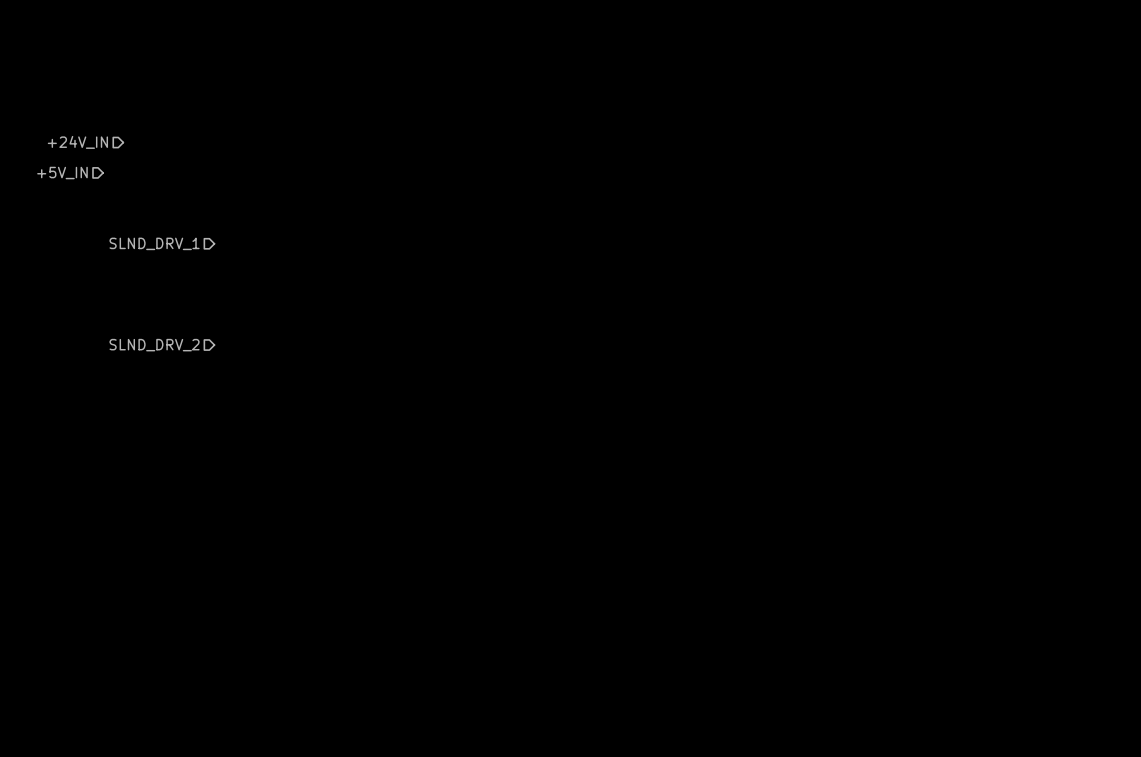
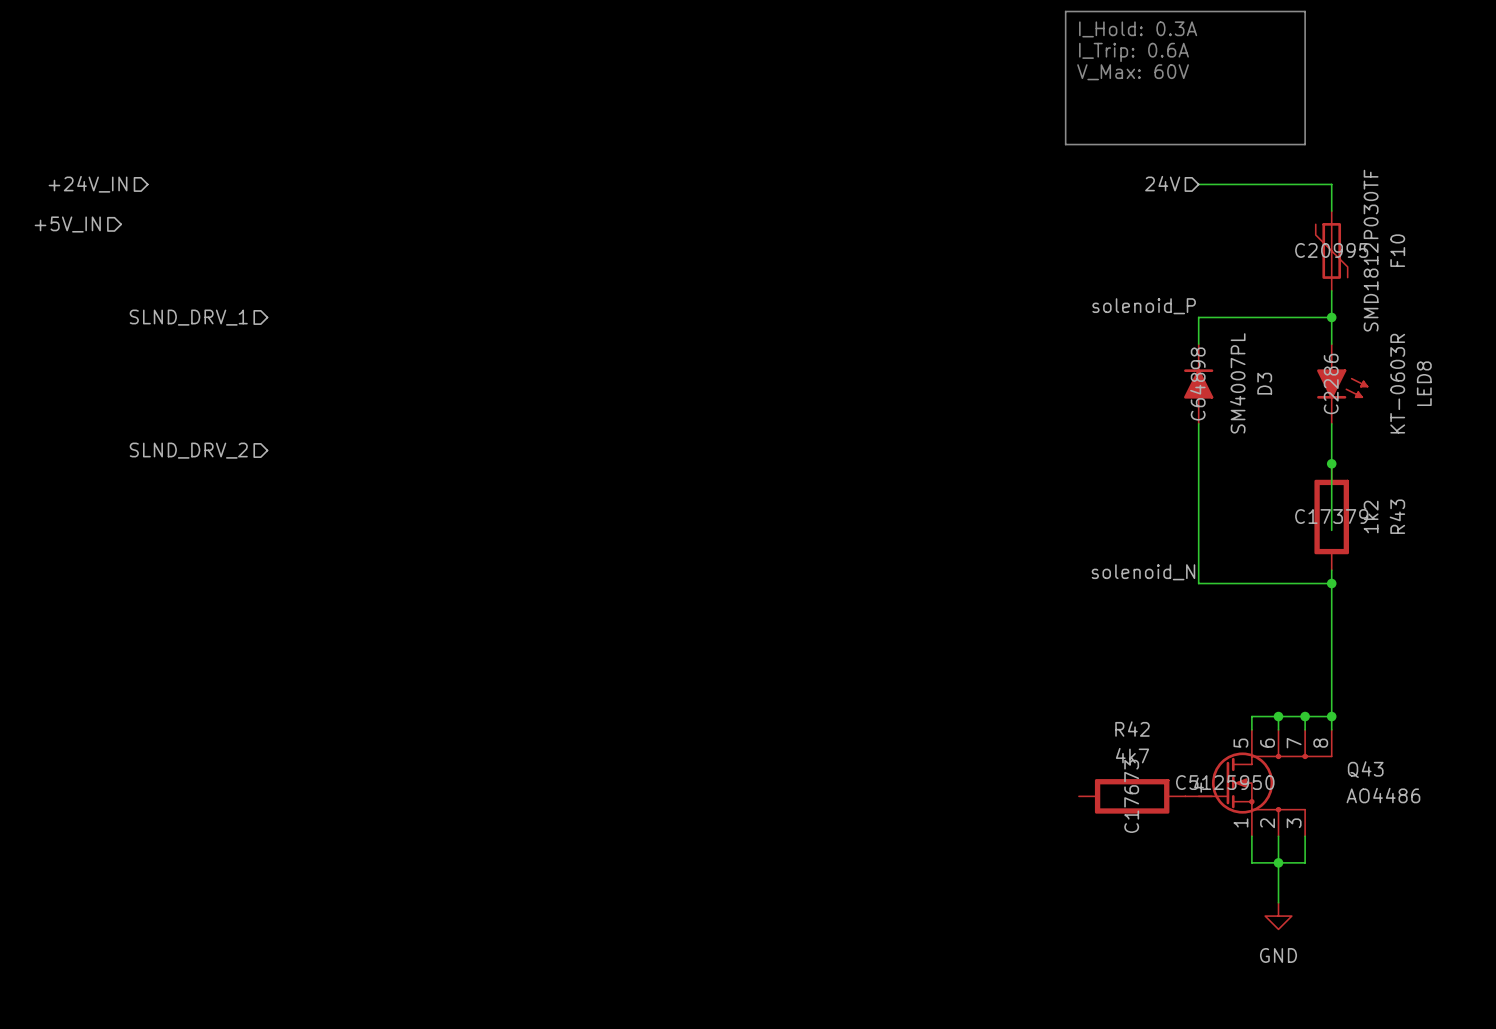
line: none -> (1065, 11) (1305, 11) (1305, 144) (1065, 144) (1065, 11)
text: none -> I_Hold: 0.3A (1138, 29)
text: none -> I_Trip: 0.6A (1134, 52)
text: none -> V_Max: 60V (1133, 72)
hierarchical label: none -> 24V (1162, 183)
wire: none -> (1198, 184) (1331, 184) (1331, 211)
F10: none -> SMD1812P030TF (1331, 250)
wire: none -> (1331, 290) (1331, 344)
label: none -> solenoid_P (1144, 306)
wire: none -> (1331, 317) (1198, 317) (1198, 344)
junction: none -> (1331, 317)
D3: none -> SM4007PL (1198, 383)
LED8: none -> KT-0603R (1342, 383)
wire: none -> (1198, 423) (1198, 583) (1331, 583)
wire: none -> (1331, 423) (1331, 530)
junction: none -> (1331, 463)
R43: none -> 1k2 (1331, 517)
wire: none -> (1331, 570) (1331, 729)
label: none -> solenoid_N (1143, 572)
junction: none -> (1331, 583)
wire: none -> (1278, 716) (1278, 729)
junction: none -> (1278, 716)
wire: none -> (1305, 716) (1305, 729)
junction: none -> (1305, 716)
wire: none -> (1331, 716) (1251, 716) (1251, 729)
junction: none -> (1331, 716)
Q43: none -> AO4486 (1258, 783)
R42: none -> 4k7 (1132, 796)
wire: none -> (1251, 836) (1251, 862) (1305, 862) (1305, 836)
wire: none -> (1278, 836) (1278, 902)
junction: none -> (1278, 862)
power symbol: none -> GND (1278, 916)

